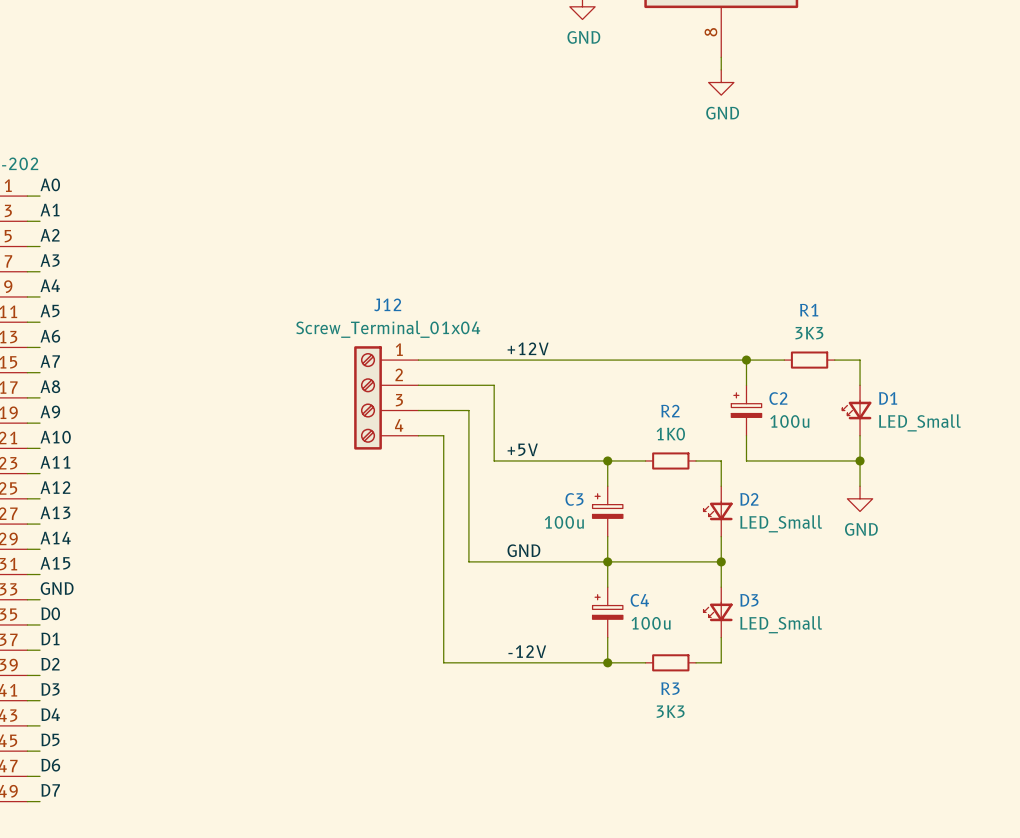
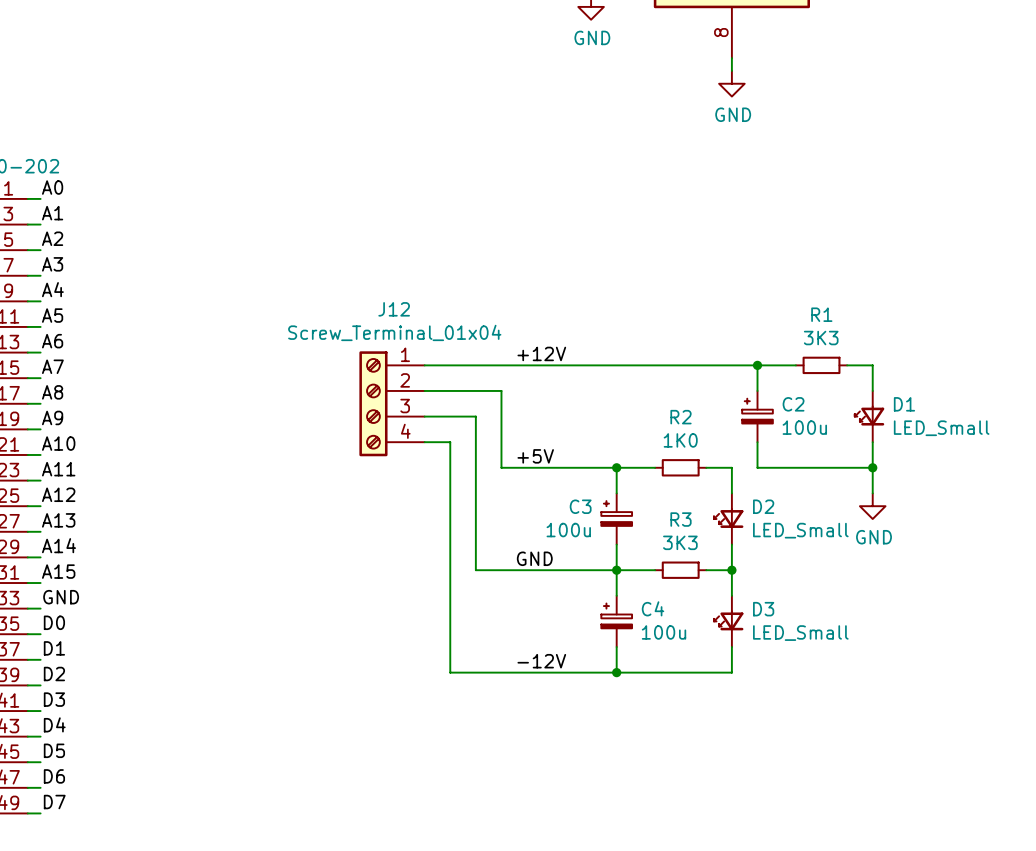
wire: (645, 561) (696, 561) -> (655, 672) (706, 672)
R3 position: (670, 662) -> (680, 570)
R3 name position: R3 (670, 688) -> R3 (681, 519)
R3 value position: 3K3 (670, 711) -> 3K3 (680, 542)

